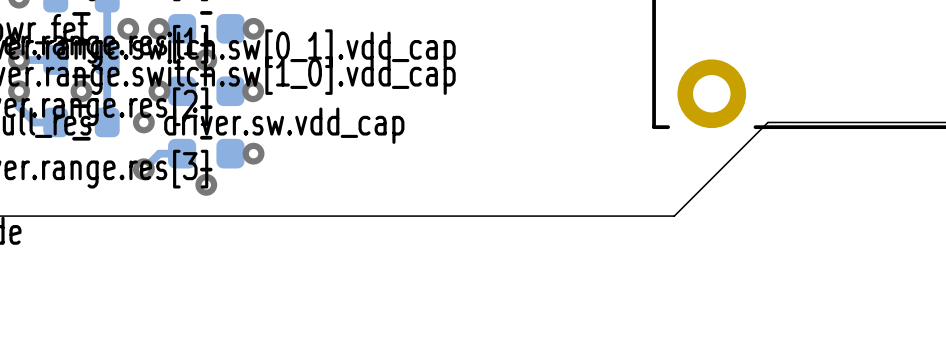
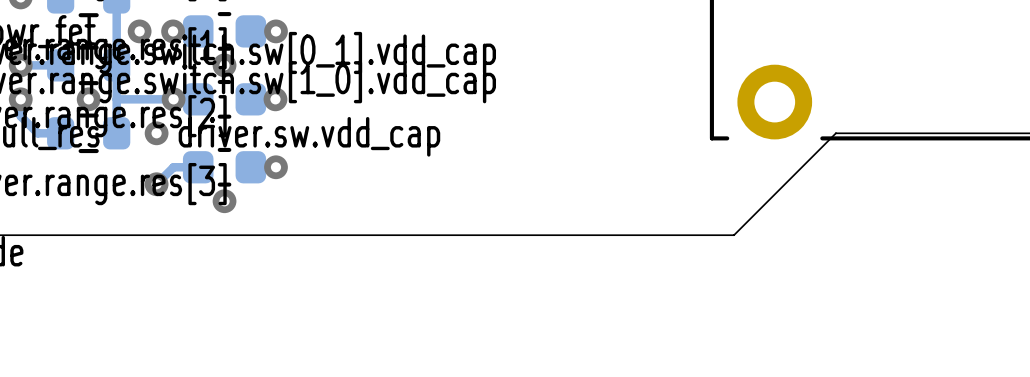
track: none -> (173, 99) (116, 99)

